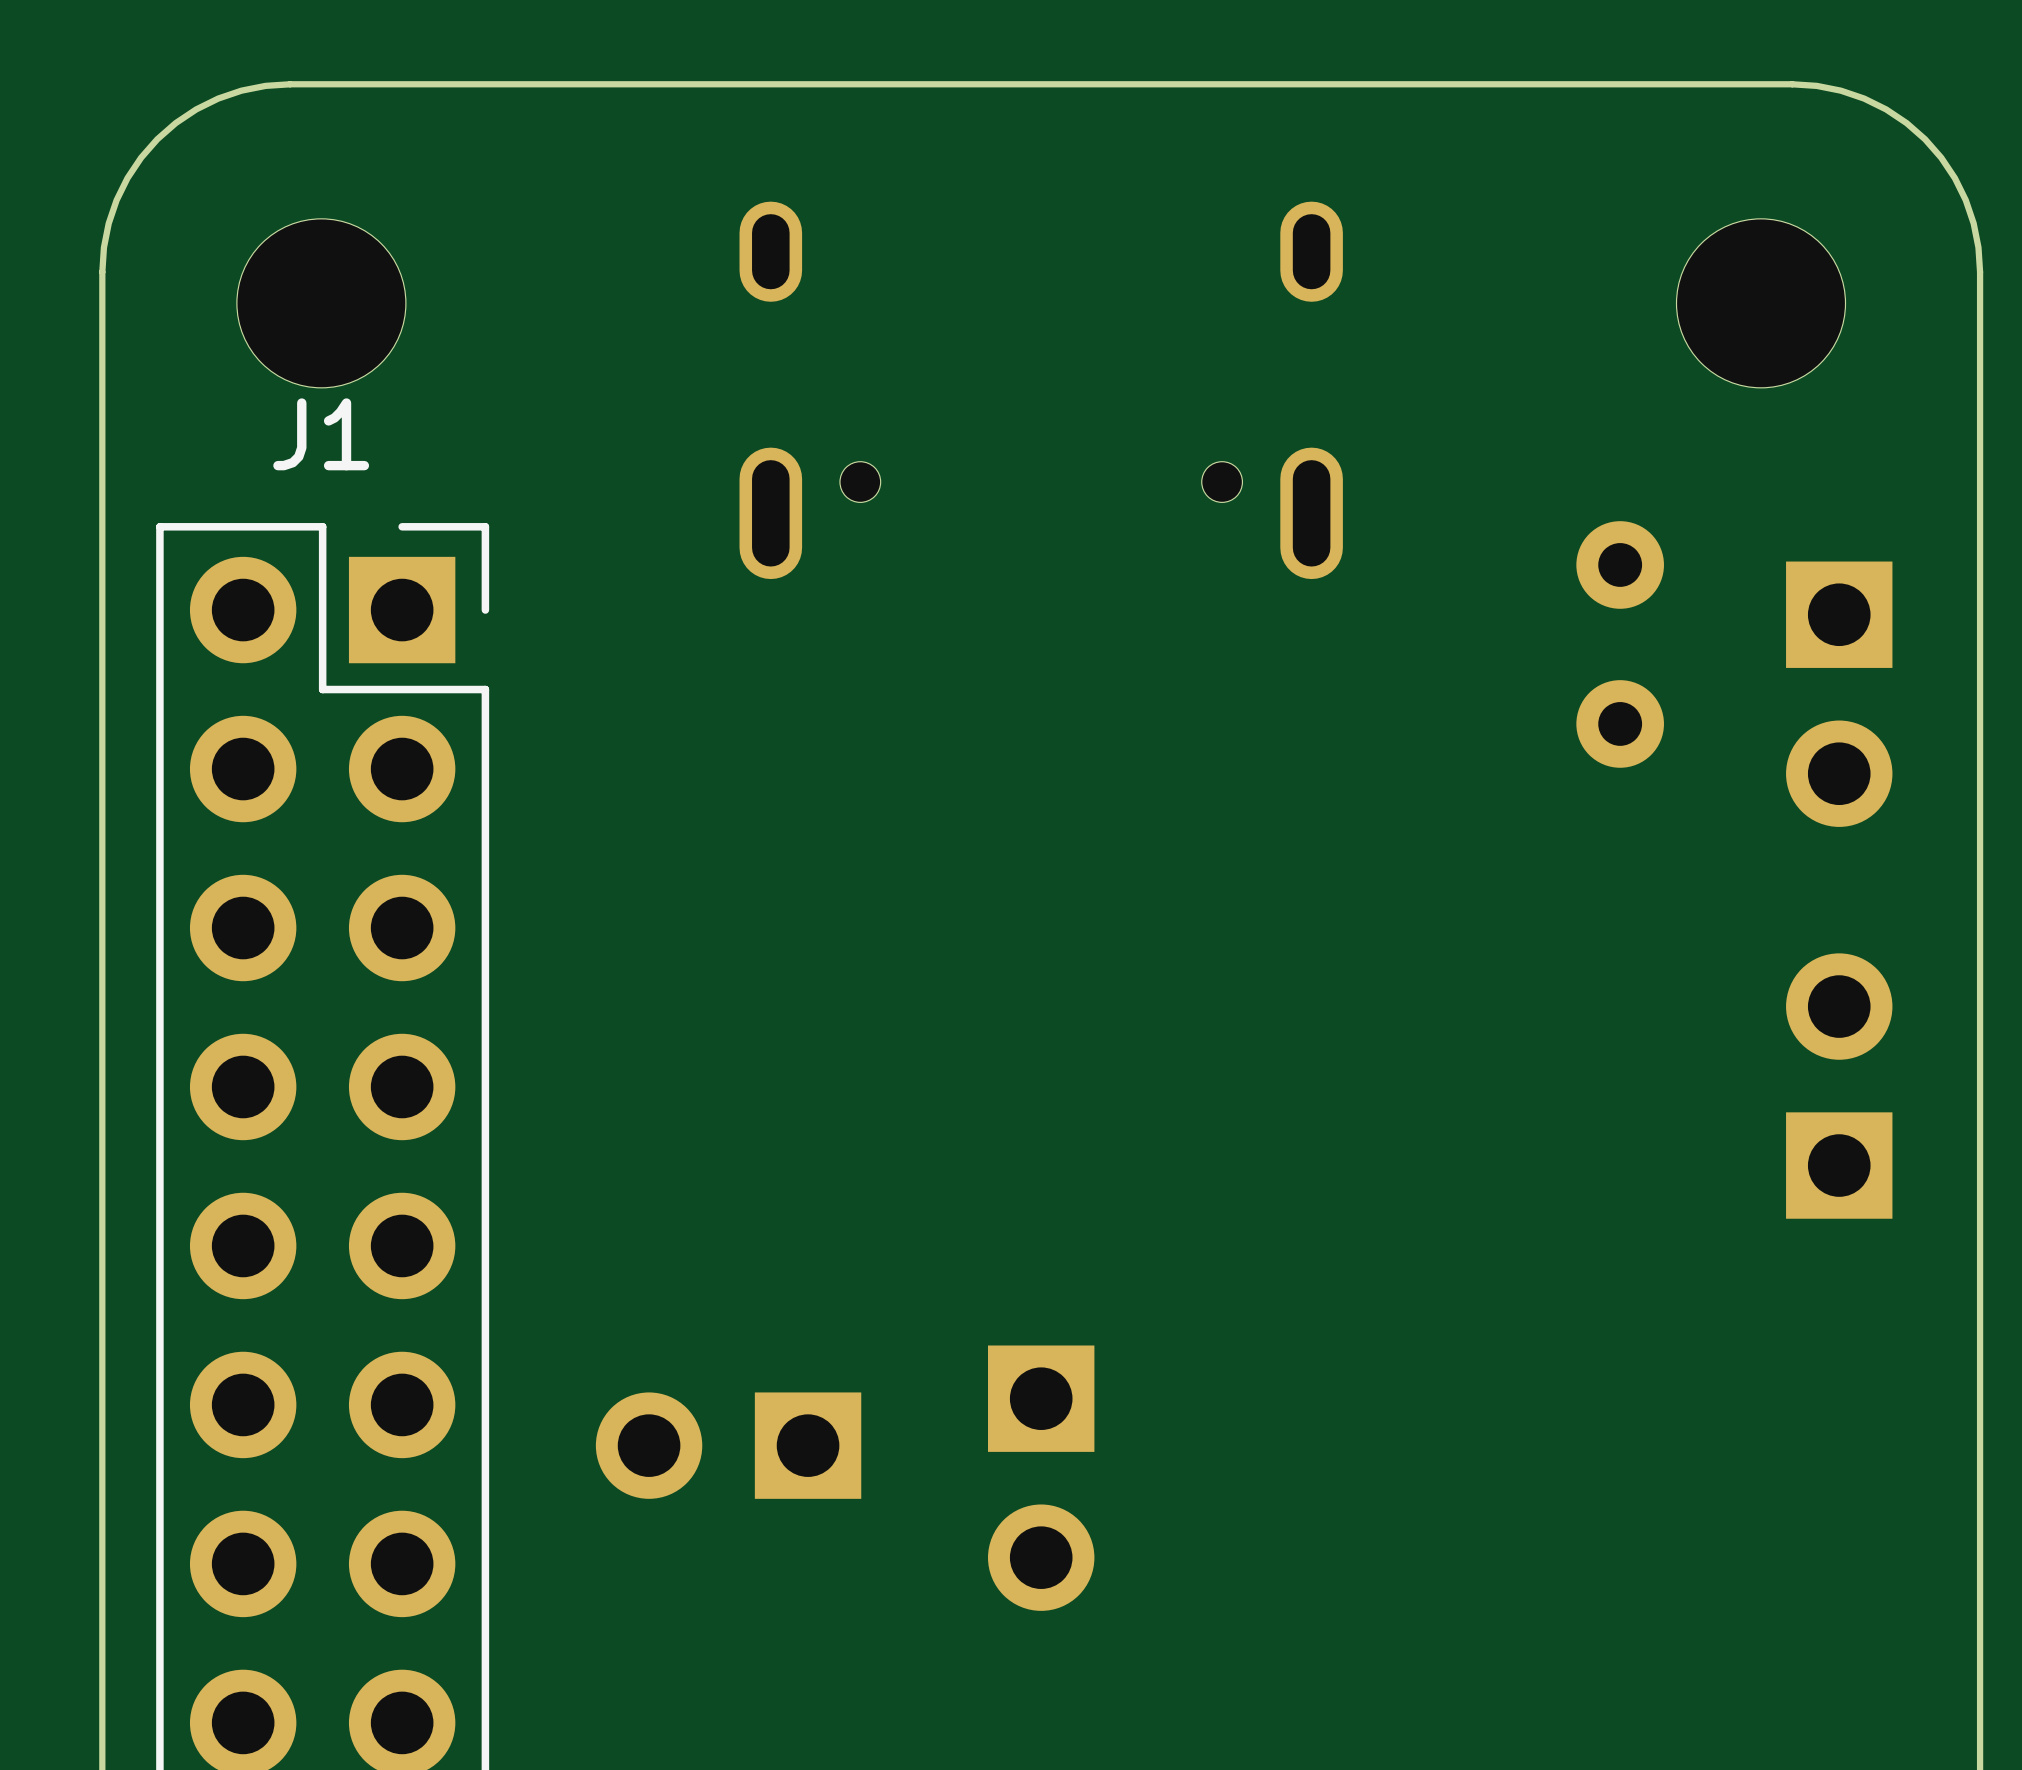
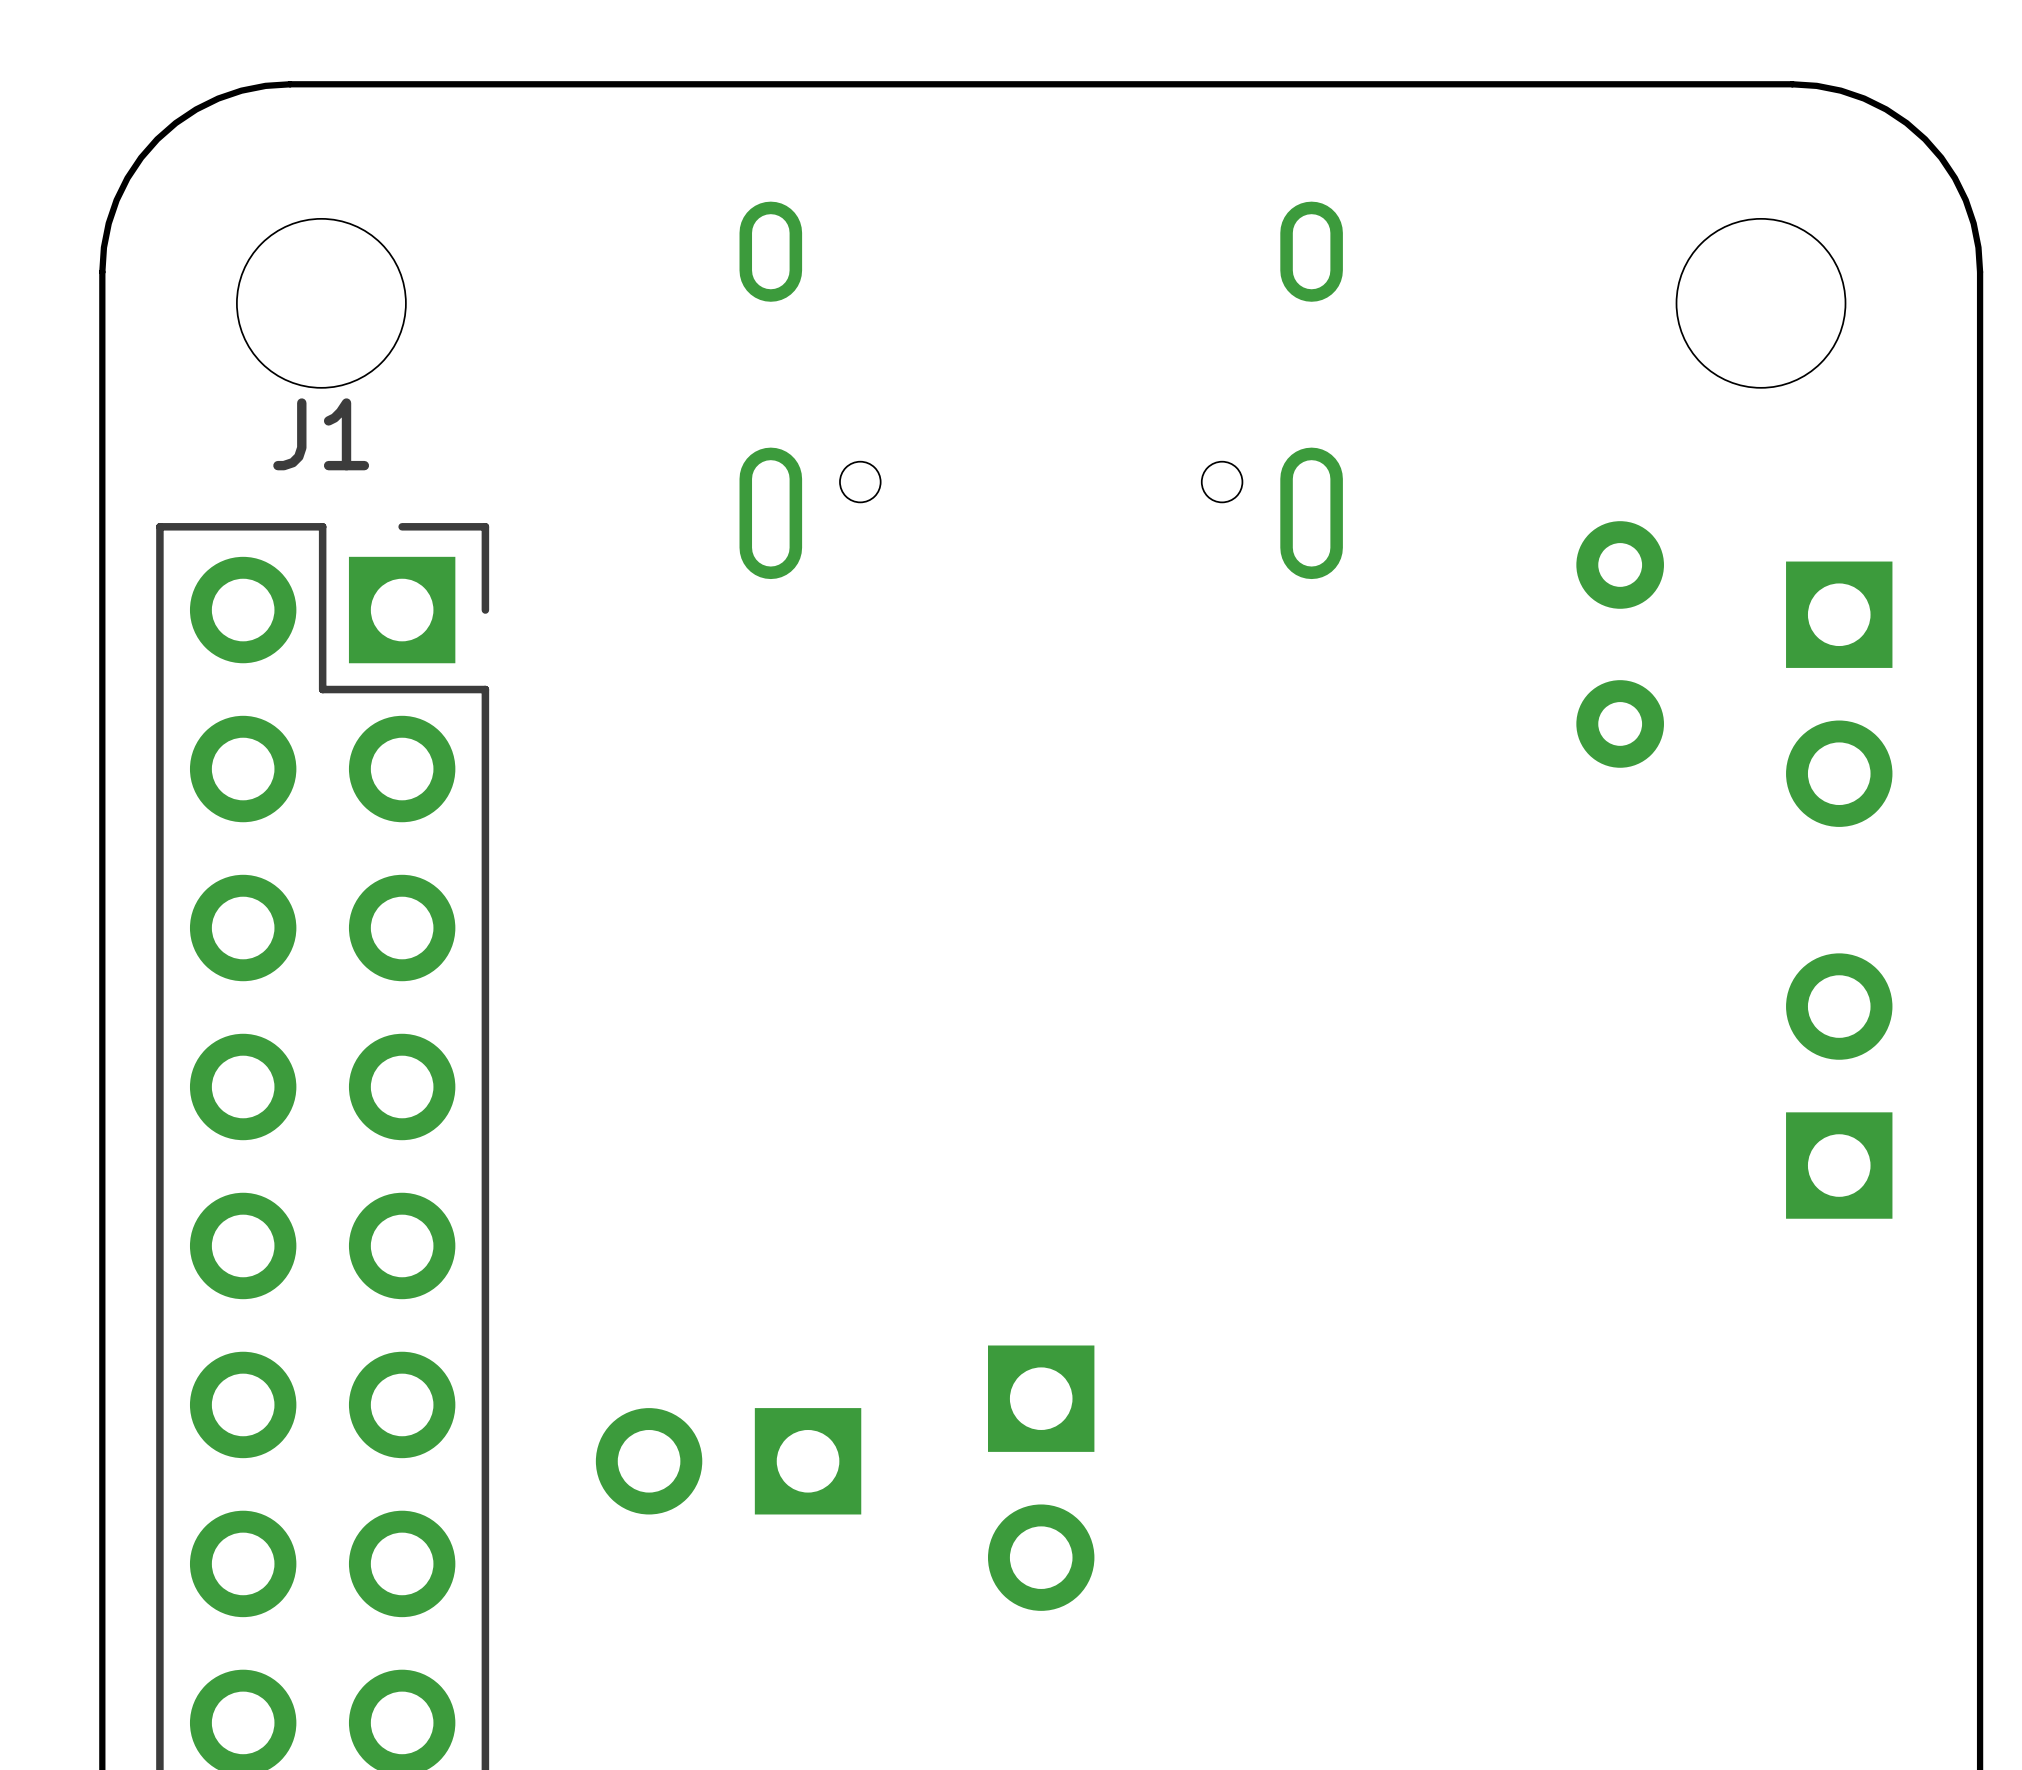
part position: (728, 1445) -> (728, 1461)

